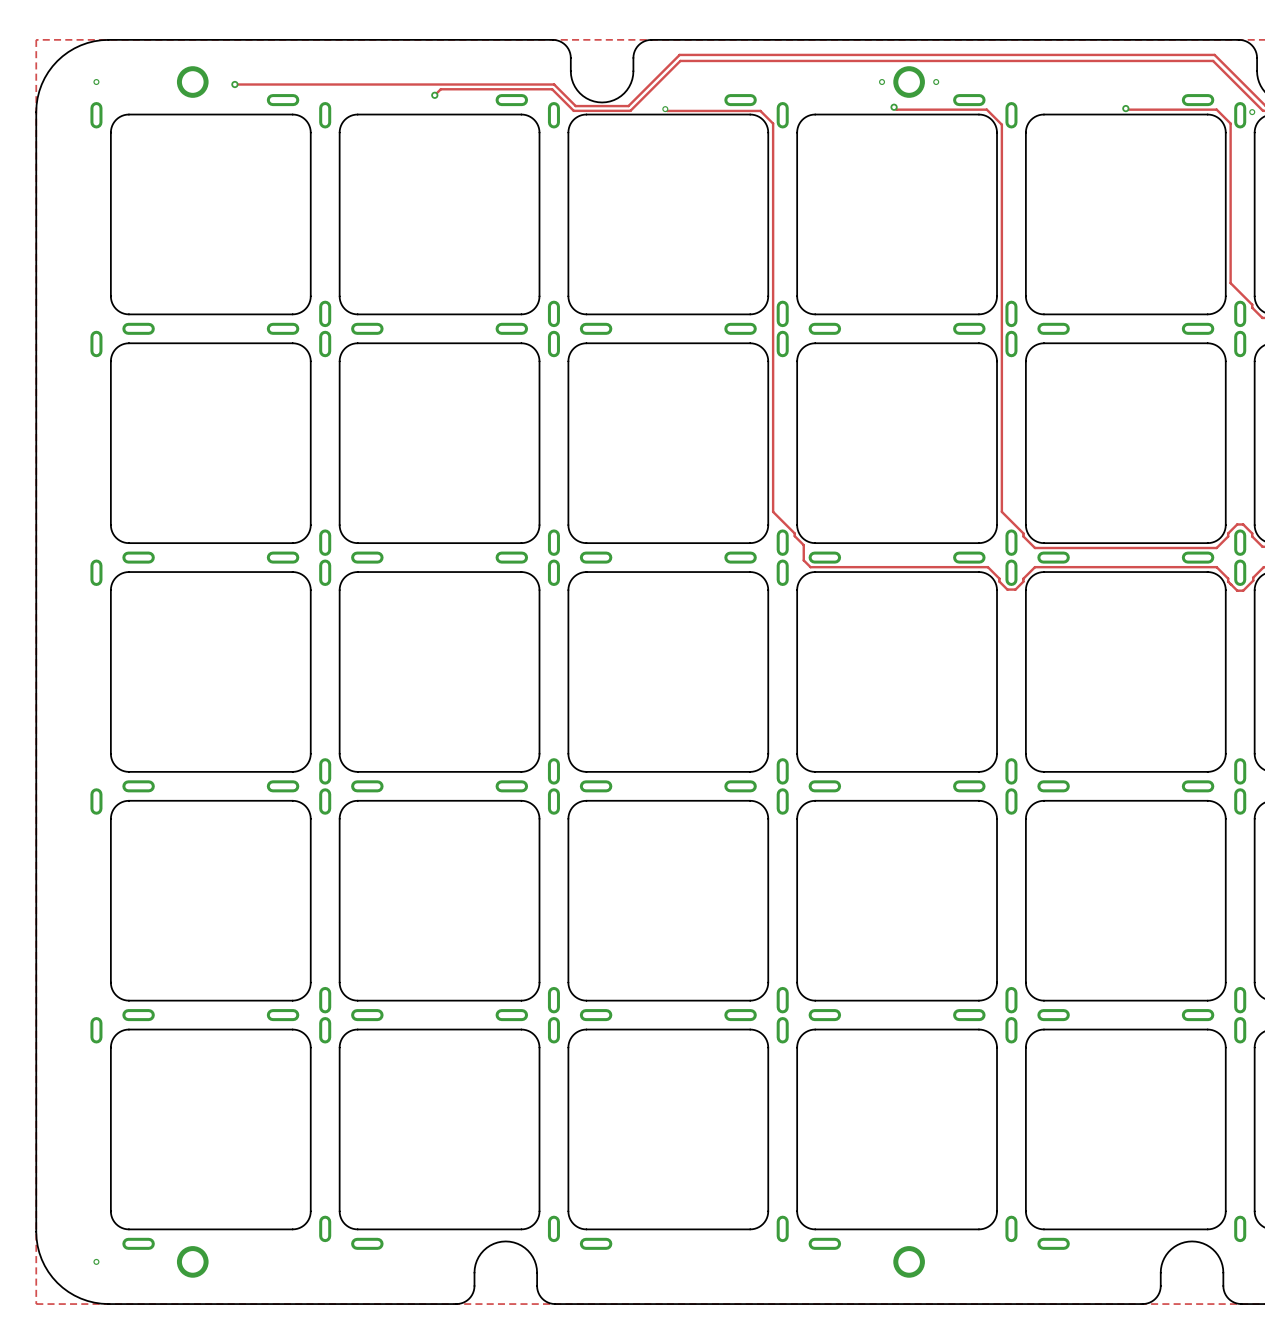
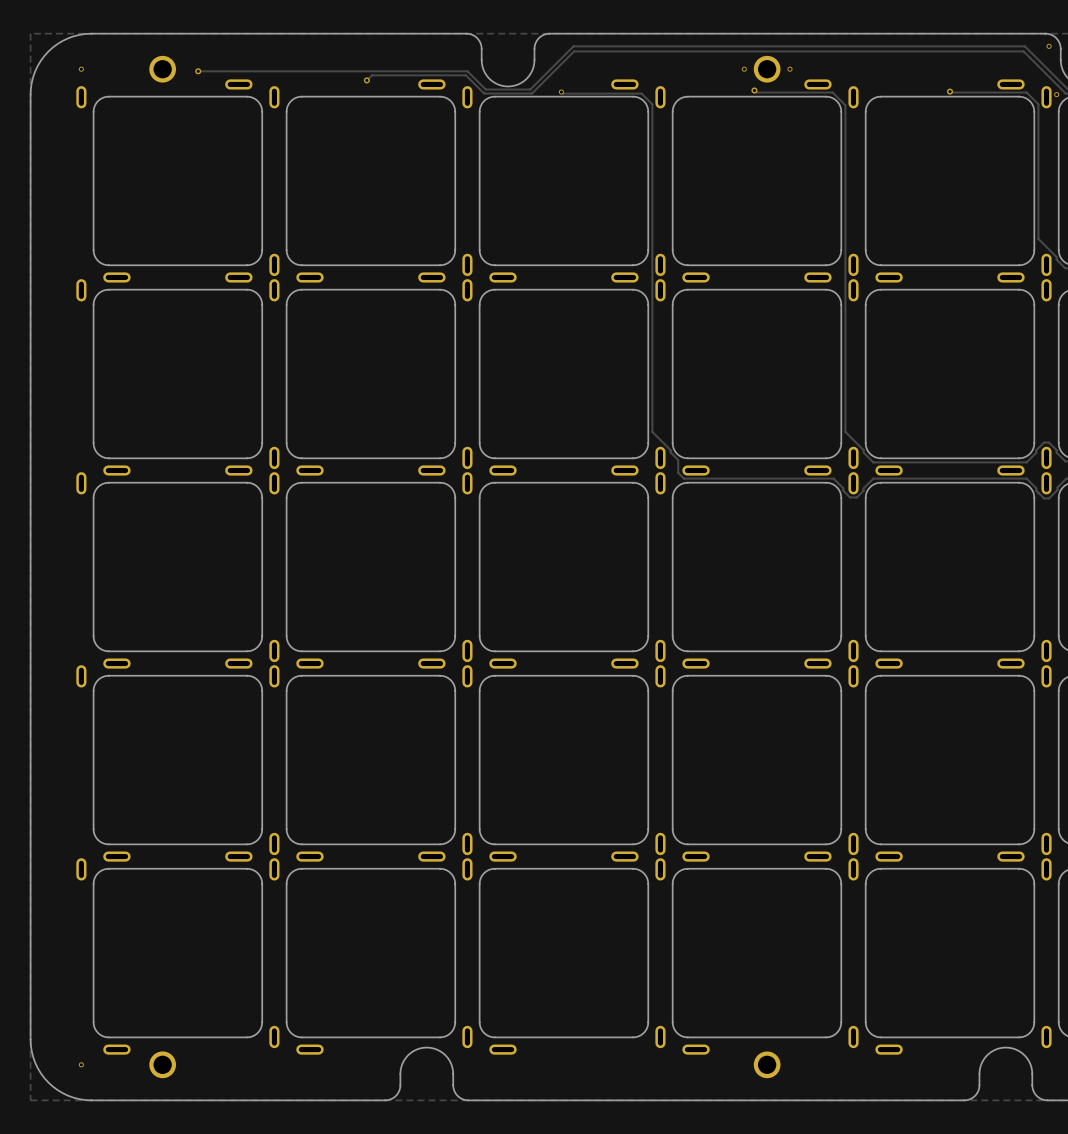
via: none -> (1049, 46)

